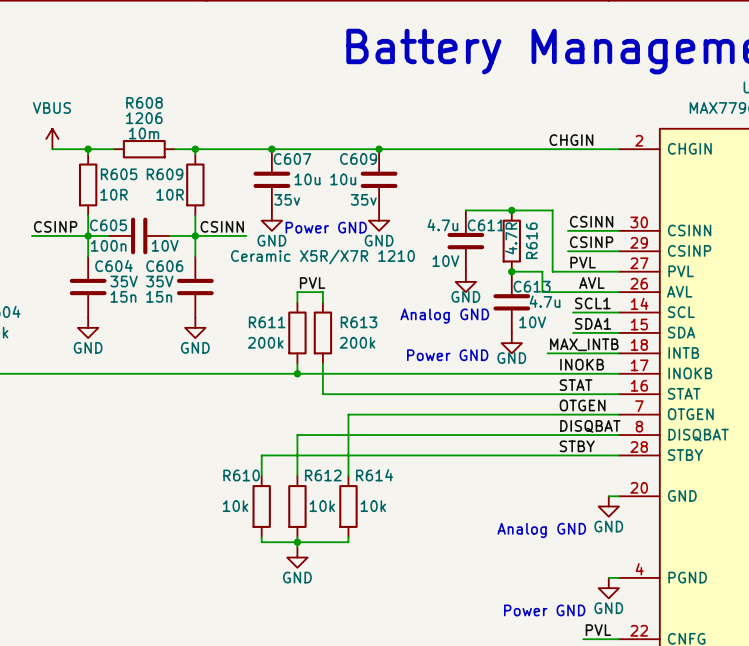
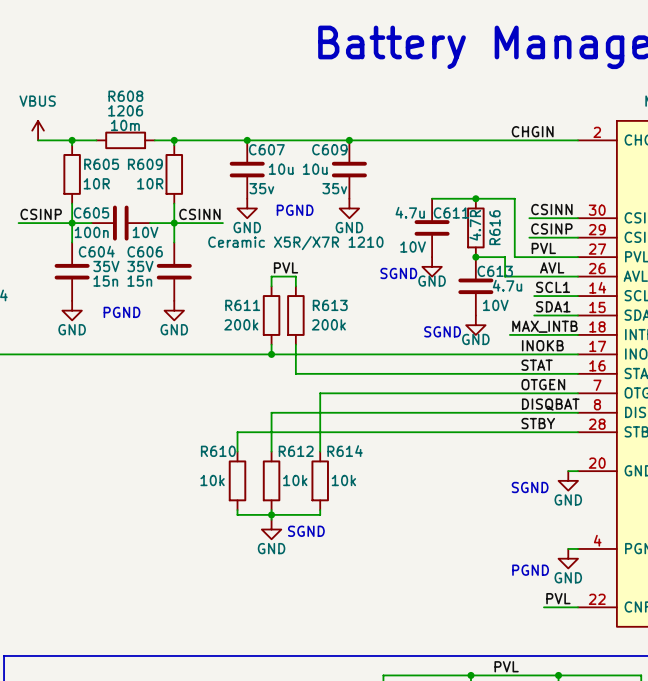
text: Power GND (326, 227) -> PGND (295, 210)
text: none -> SGND (398, 273)
text: Analog GND (444, 316) -> none
text: none -> PGND (122, 312)
text: none -> SGND (442, 331)
text: Power GND (447, 355) -> none
text: none -> SGND (530, 487)
text: Analog GND (541, 530) -> none
text: none -> SGND (306, 531)
text: Power GND (544, 610) -> PGND (530, 570)

